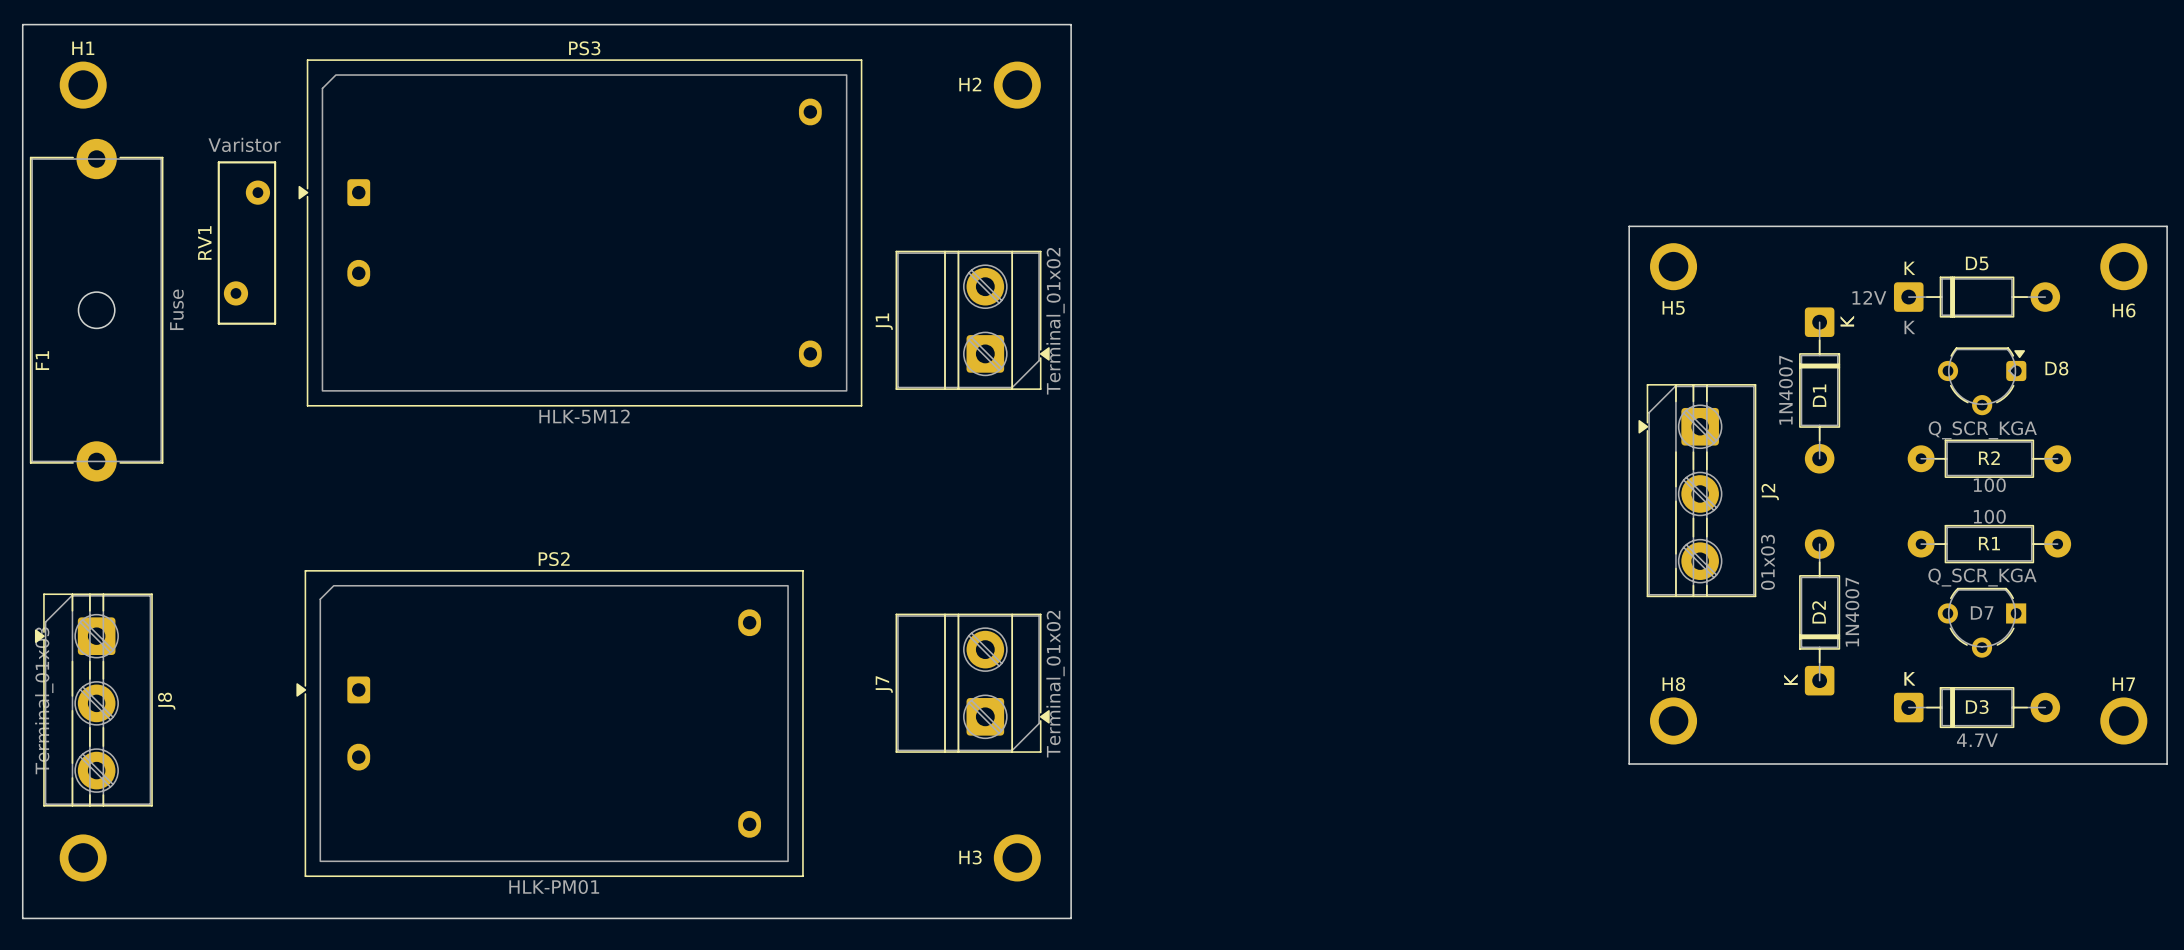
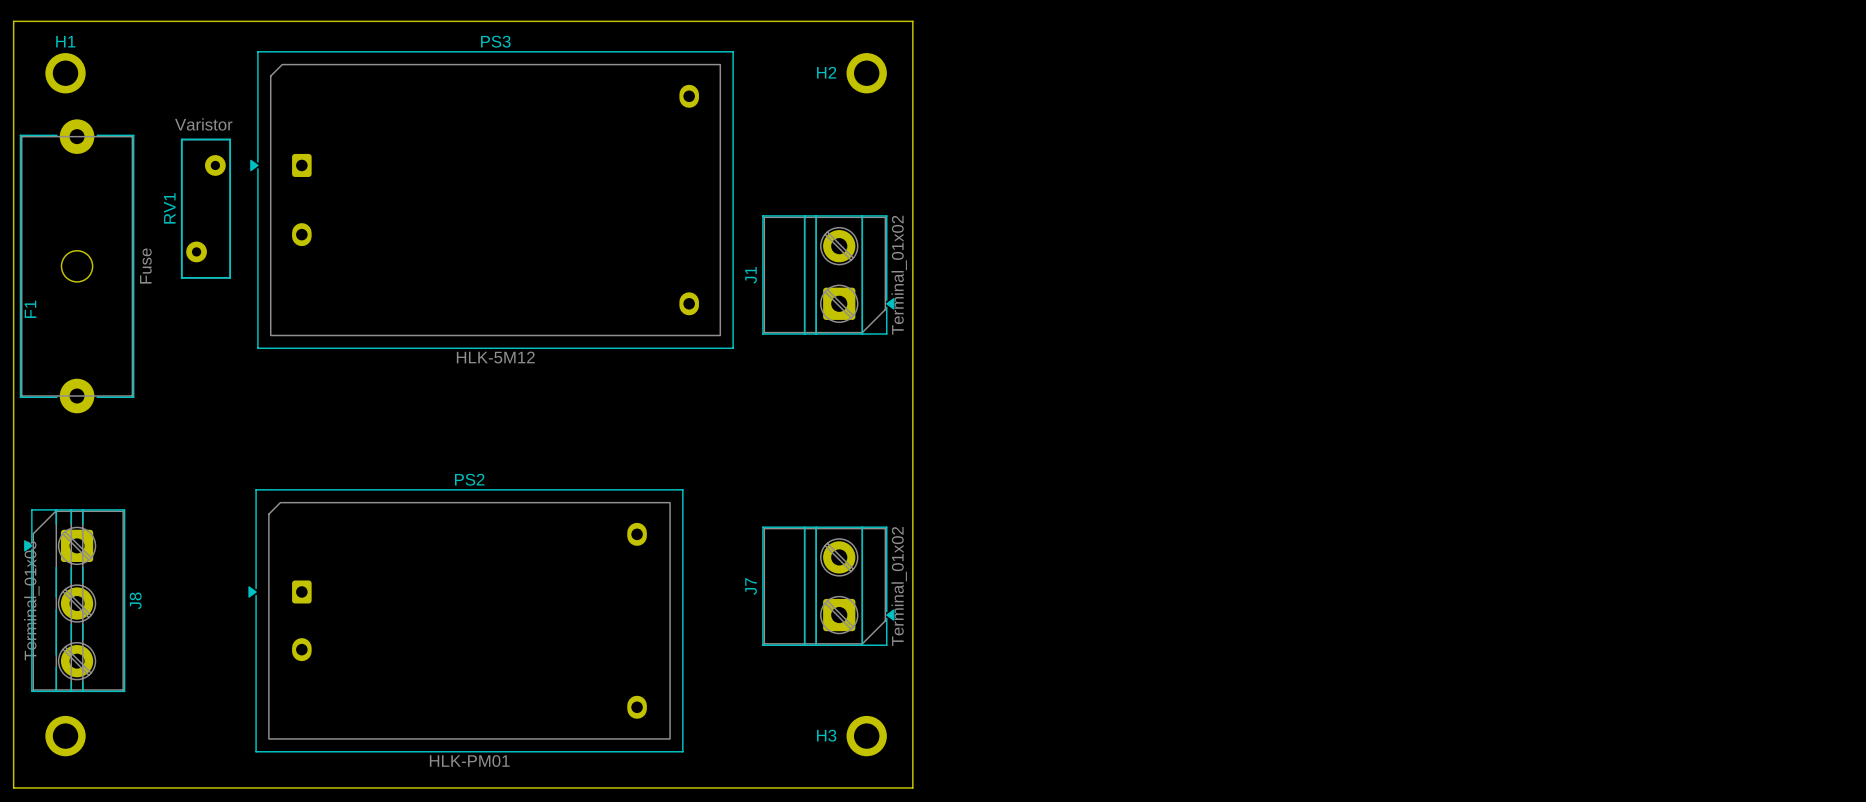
board edge: (1629, 226) (2167, 226) (2167, 764) (1629, 764) (1629, 226) -> none
H5: (1673, 266) -> none
H6: (2123, 266) -> none
D5: 12V (1977, 297) -> none
D8: Q_SCR_KGA (1982, 381) -> none
D1: 1N4007 (1819, 390) -> none
R2: 100 (1989, 458) -> none
J2: 01x03 (1697, 490) -> none
R1: 100 (1989, 544) -> none
D2: 1N4007 (1819, 612) -> none
D7: Q_SCR_KGA (1982, 622) -> none
D3: 4.7V (1977, 707) -> none
H8: (1673, 720) -> none
H7: (2123, 720) -> none

